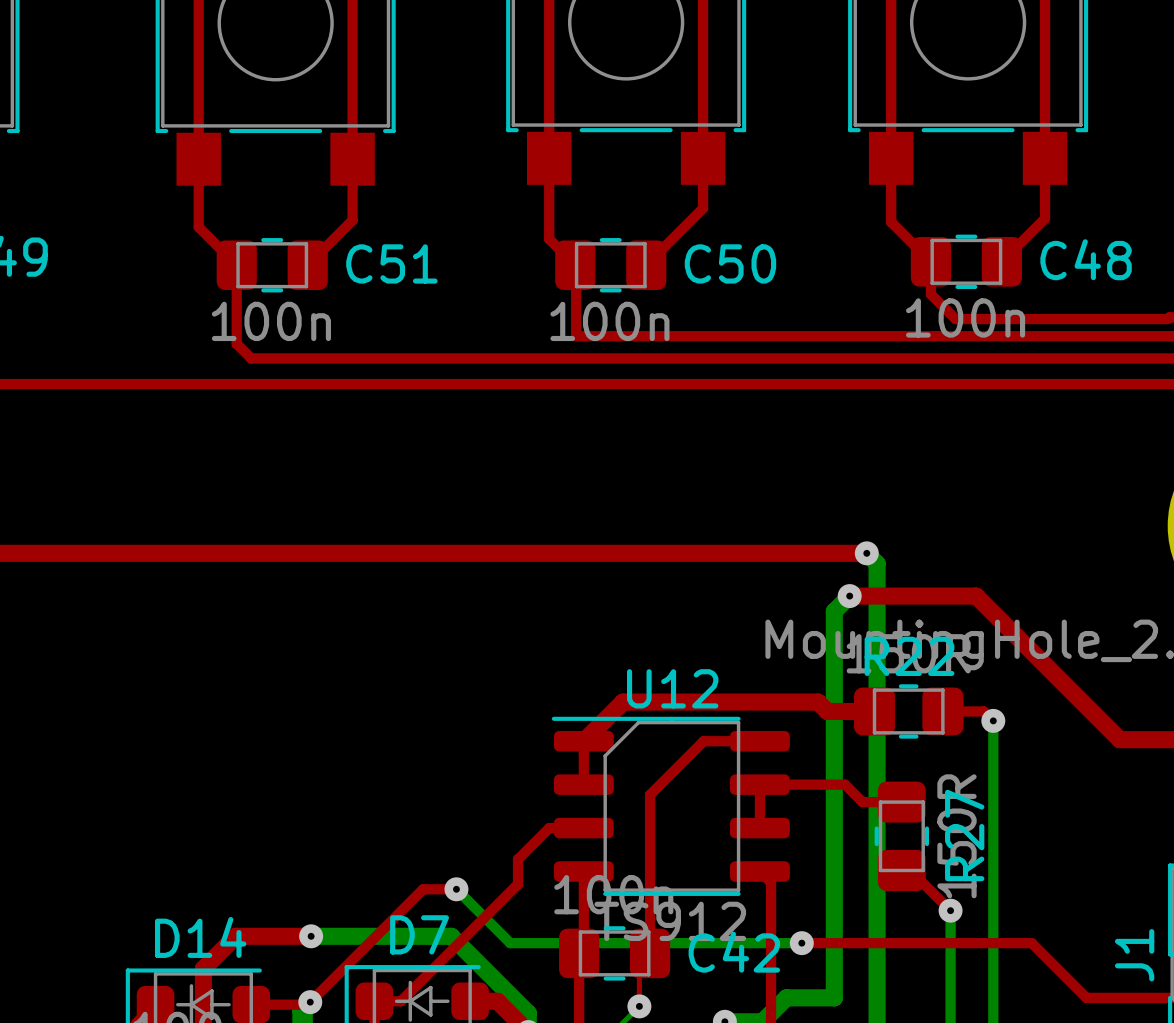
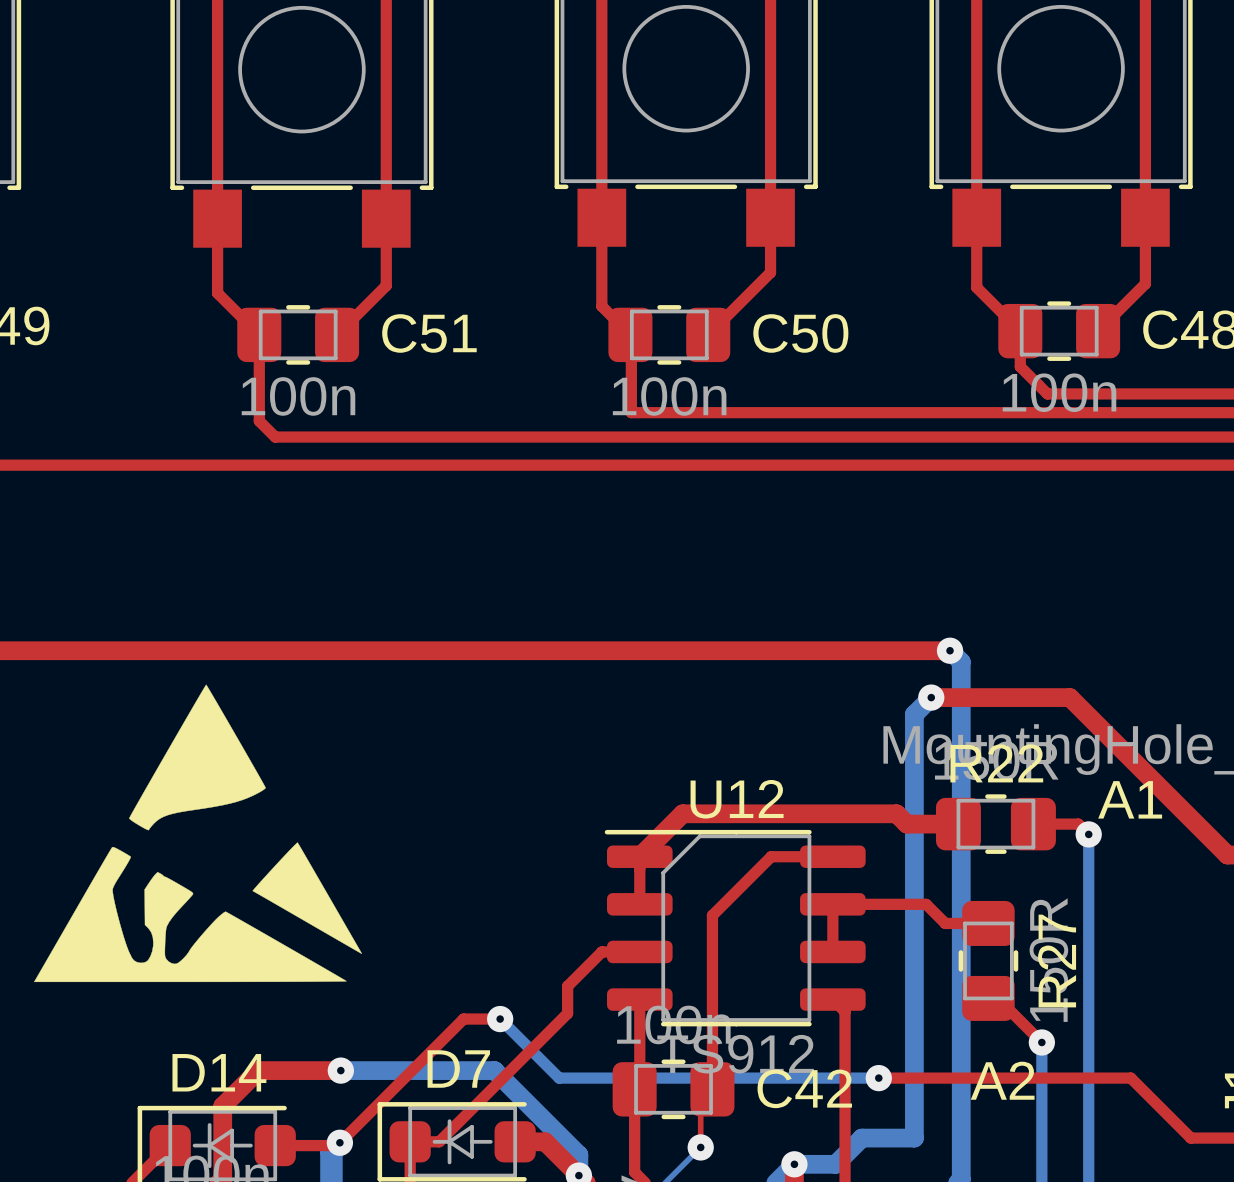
drawing: none -> [34, 684, 362, 983]
text: none -> A1 (1130, 799)
text: none -> A2 (1002, 1080)

